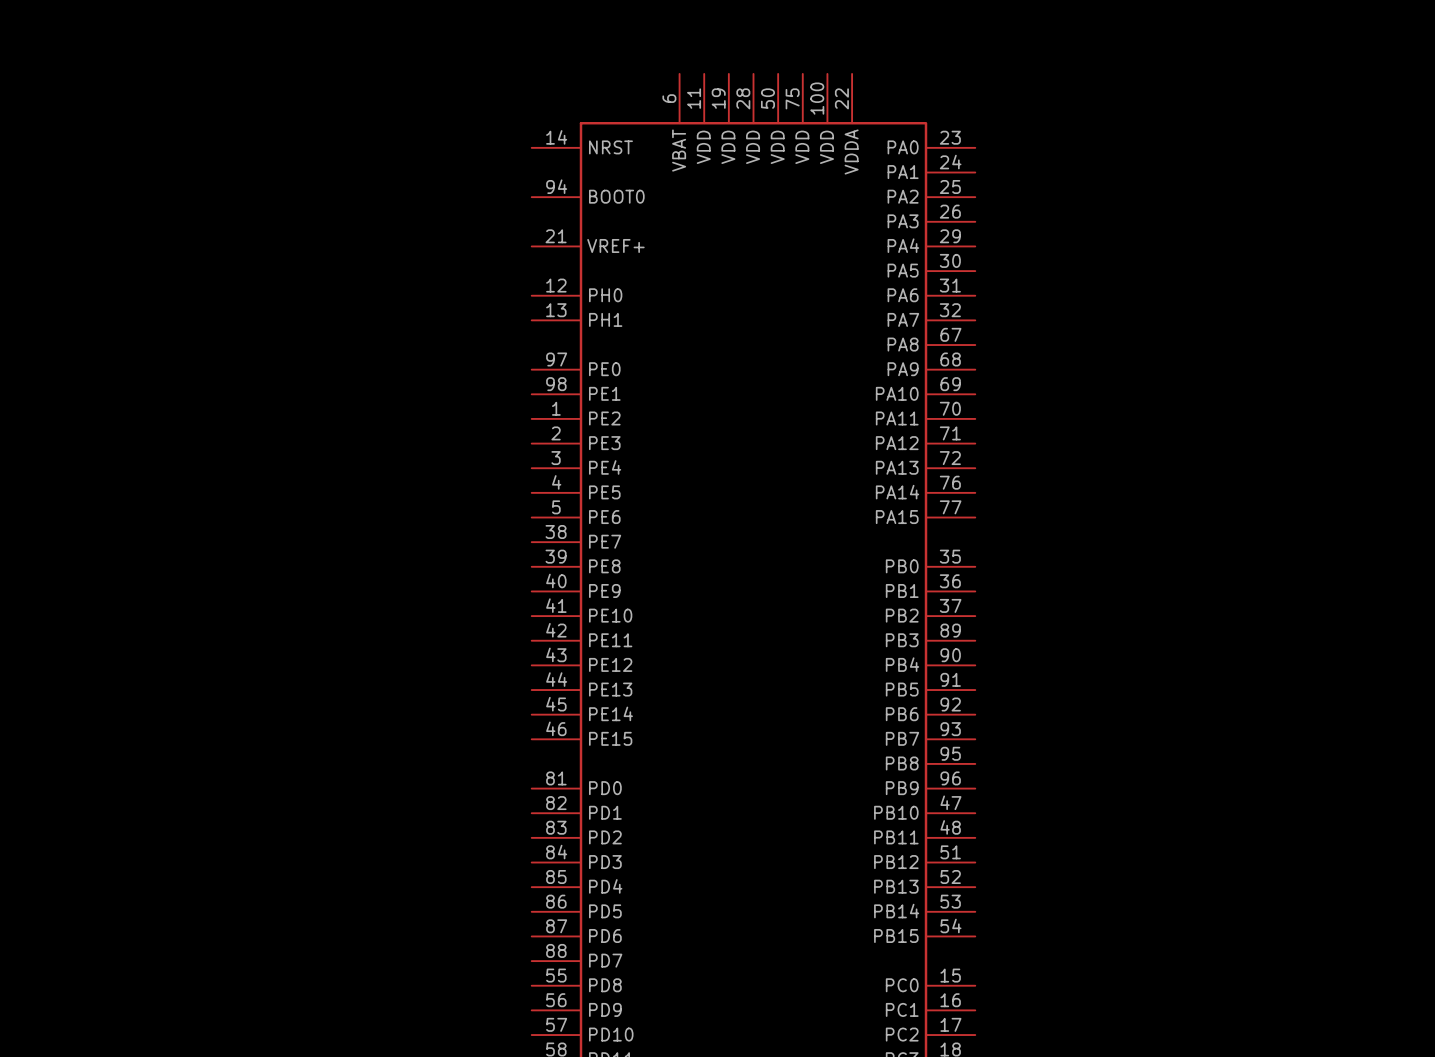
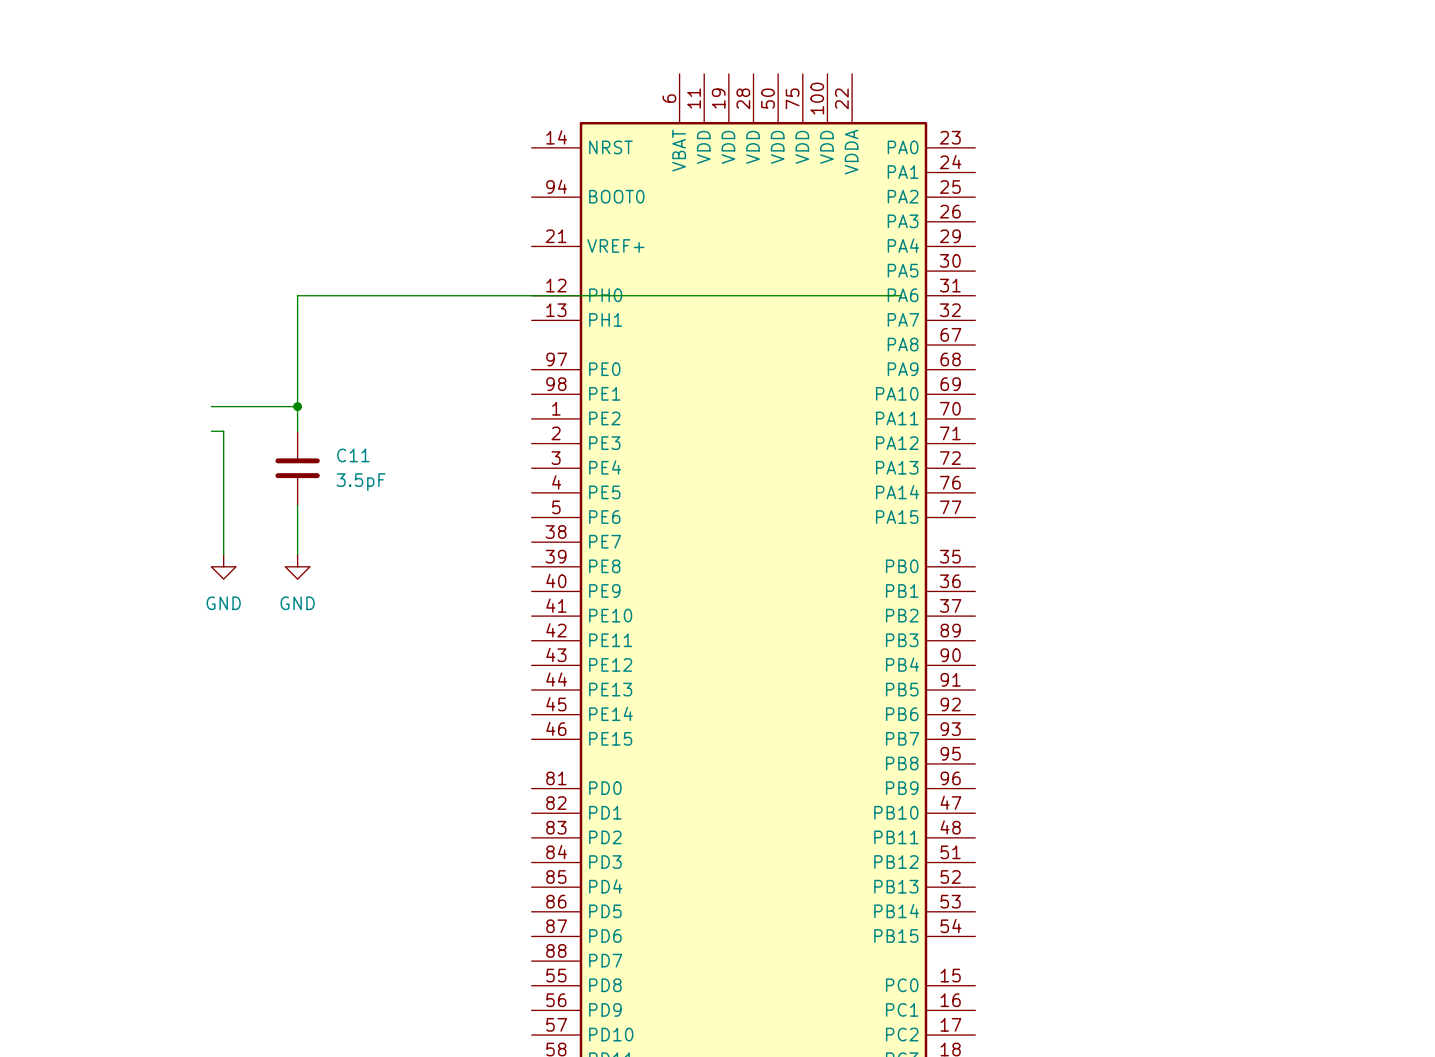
wire: none -> (901, 295) (297, 295) (297, 431)
wire: none -> (211, 406) (297, 406)
junction: none -> (297, 406)
wire: none -> (211, 431) (223, 431) (223, 554)
C11: none -> 3.5pF (297, 468)
wire: none -> (297, 505) (297, 554)
power symbol: none -> GND (223, 566)
power symbol: none -> GND (297, 566)

